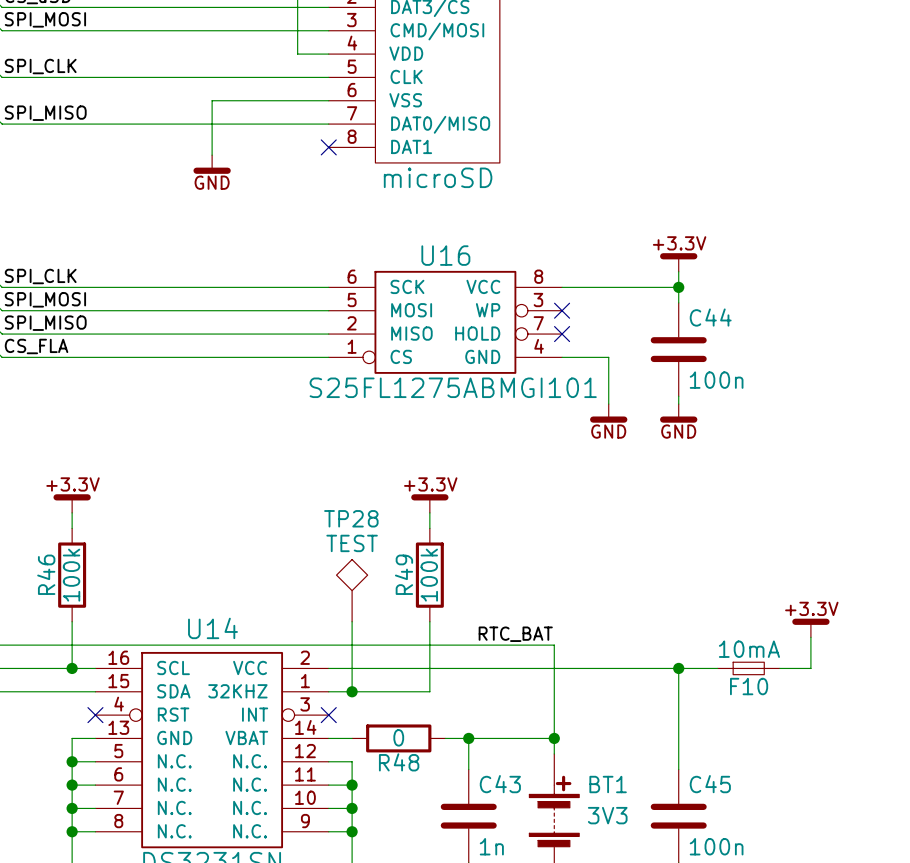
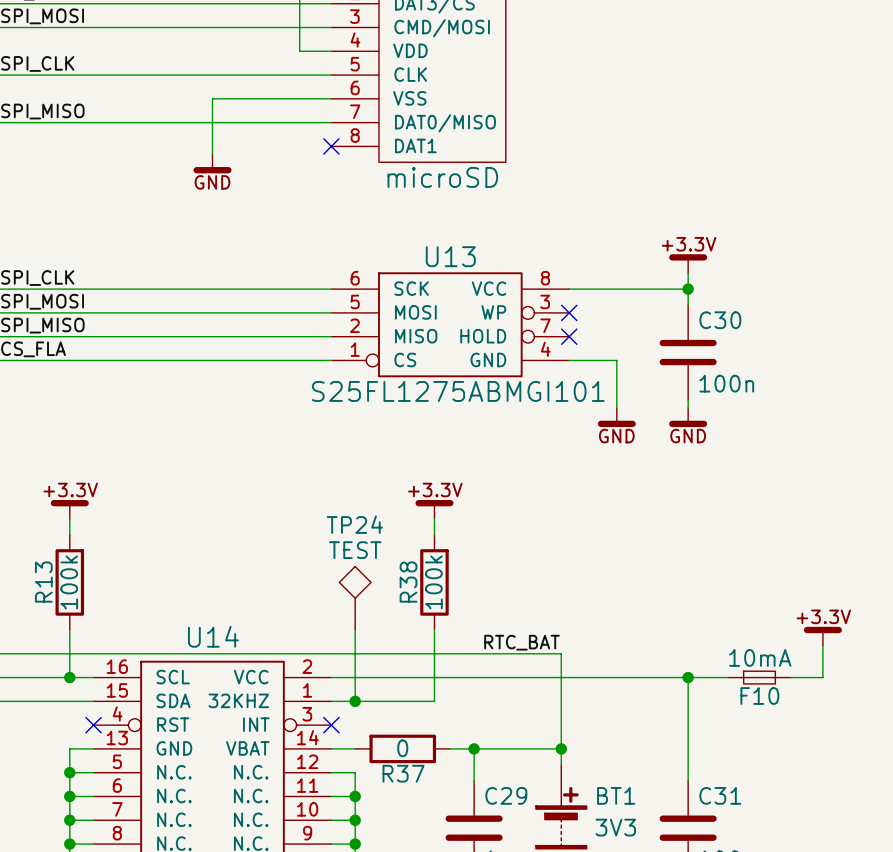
U16 name: U16 (445, 255) -> U13 (450, 256)
C44 name: C44 (710, 317) -> C30 (720, 320)
TP28 name: TP28 (351, 518) -> TP24 (354, 524)
R46 name: R46 (46, 574) -> R13 (43, 582)
R49 name: R49 (404, 574) -> R38 (408, 582)
R48 name: R48 (399, 762) -> R37 (403, 773)
C43 name: C43 (500, 784) -> C29 (506, 795)
C45 name: C45 (710, 784) -> C31 (720, 795)

